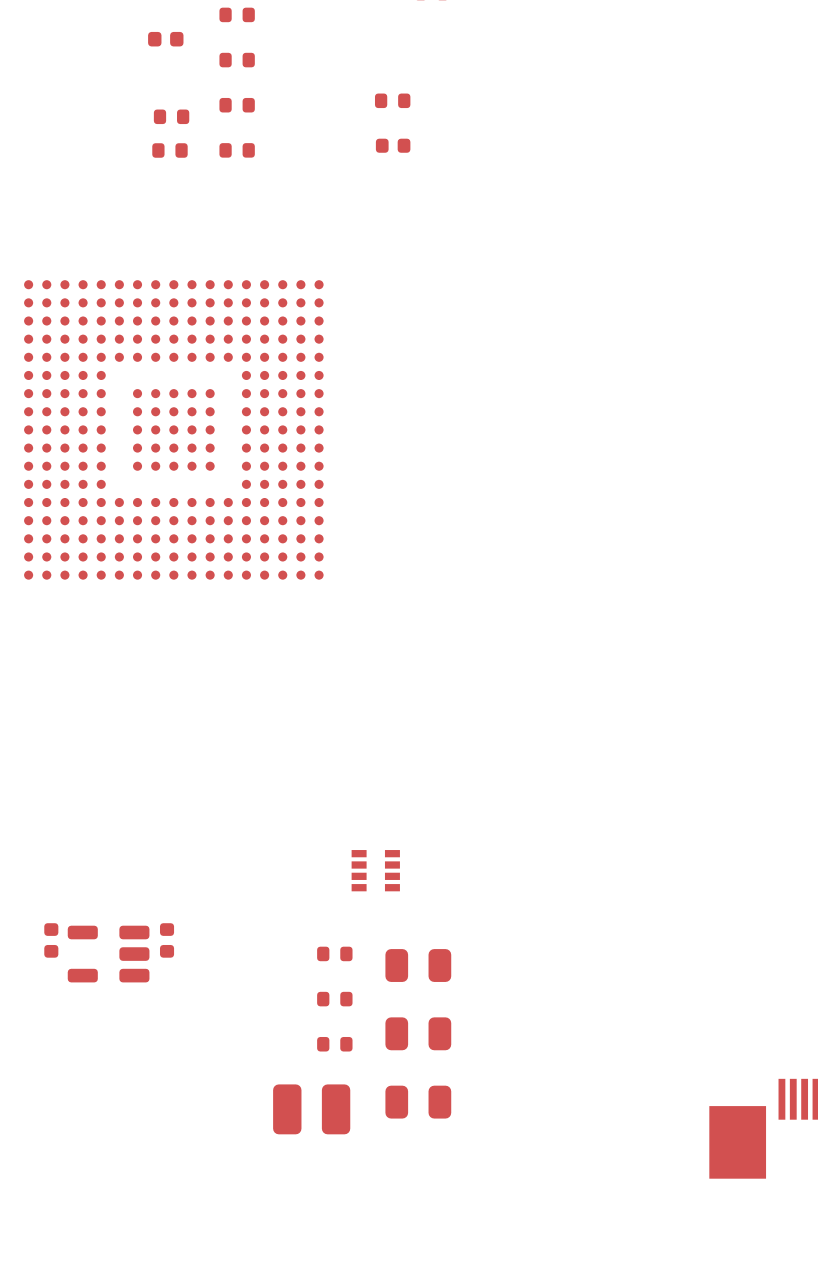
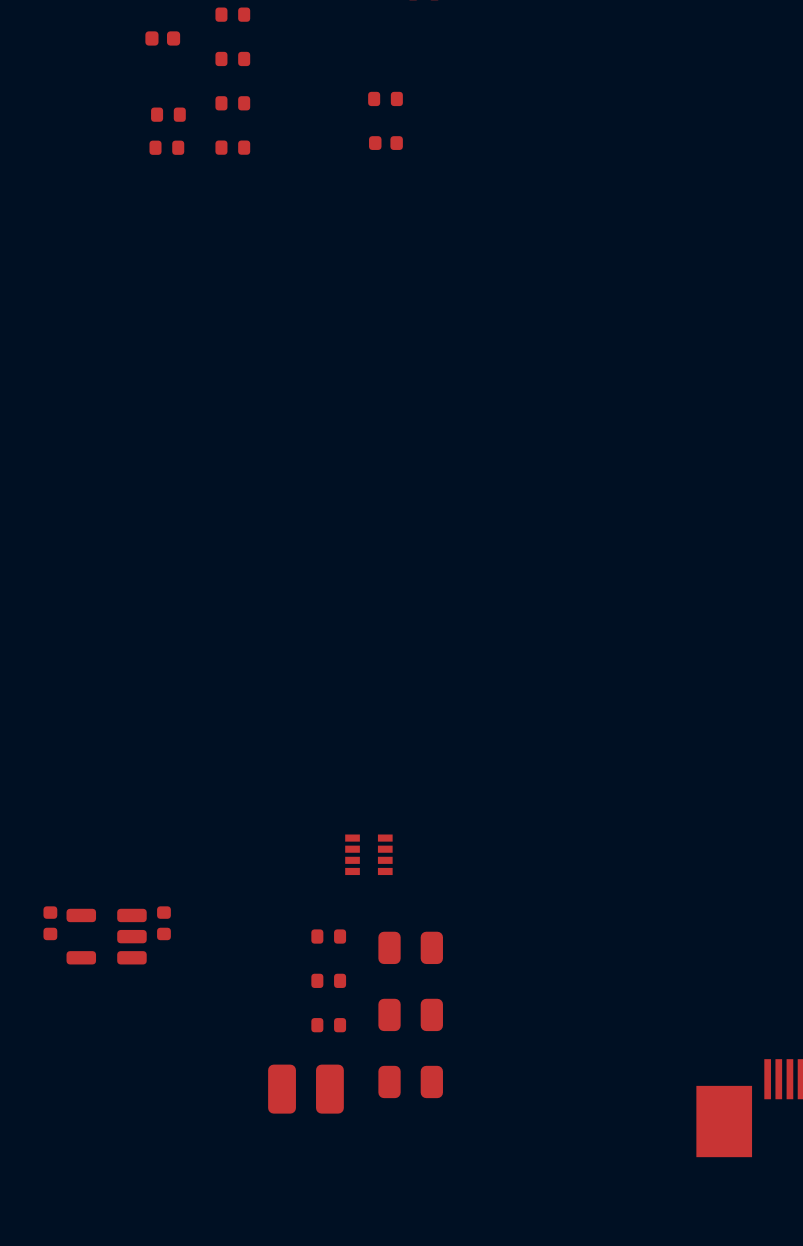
part: (173, 429) -> none

